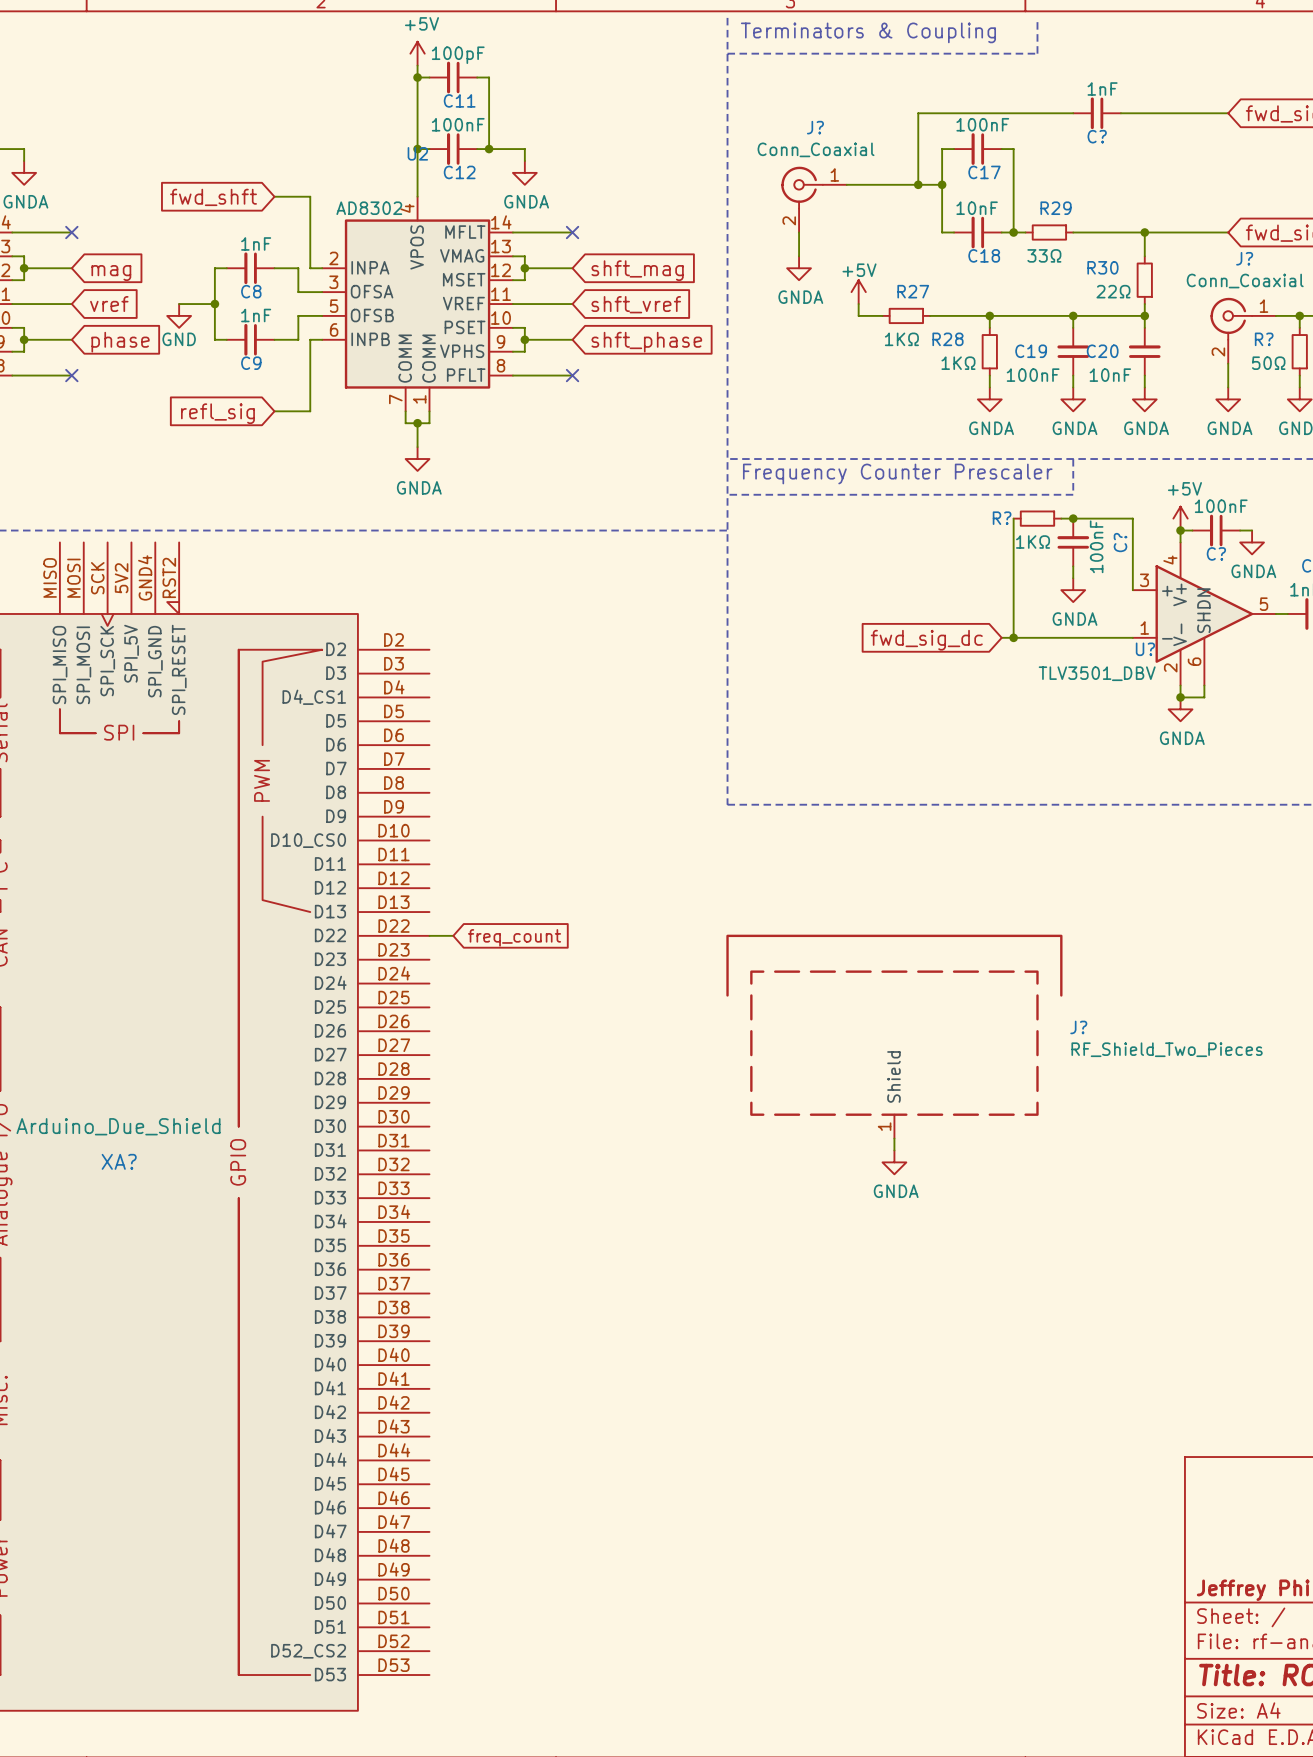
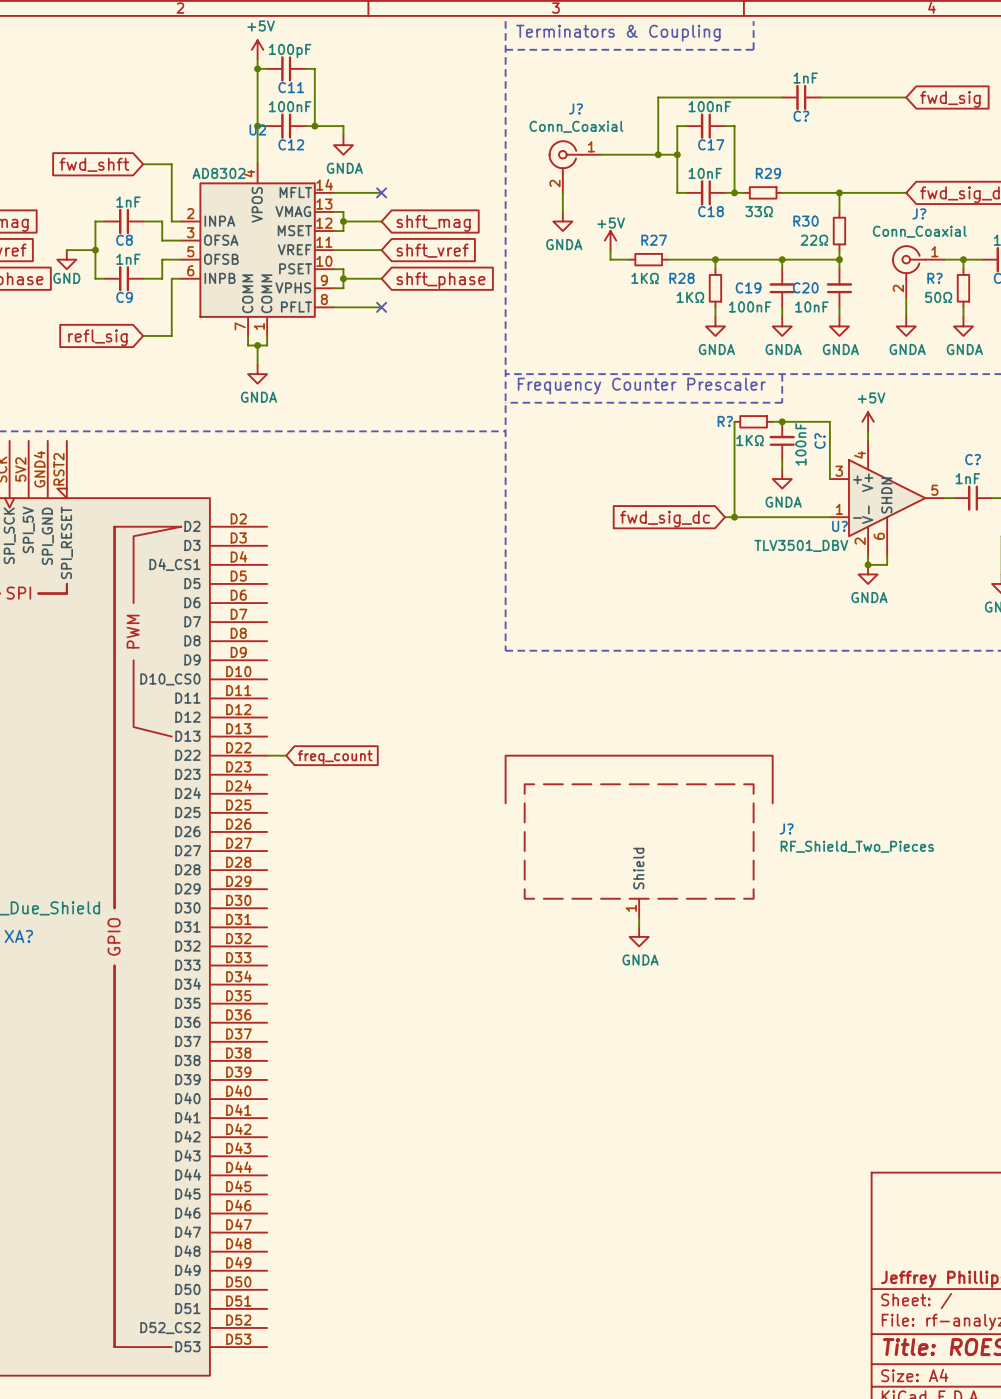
wire: (1180, 530) (1192, 530) -> none
junction: (1180, 530) -> none
C?: 100nF (1216, 530) -> none
wire: (1240, 530) (1252, 530) -> none
power symbol: GNDA (1252, 542) -> none

